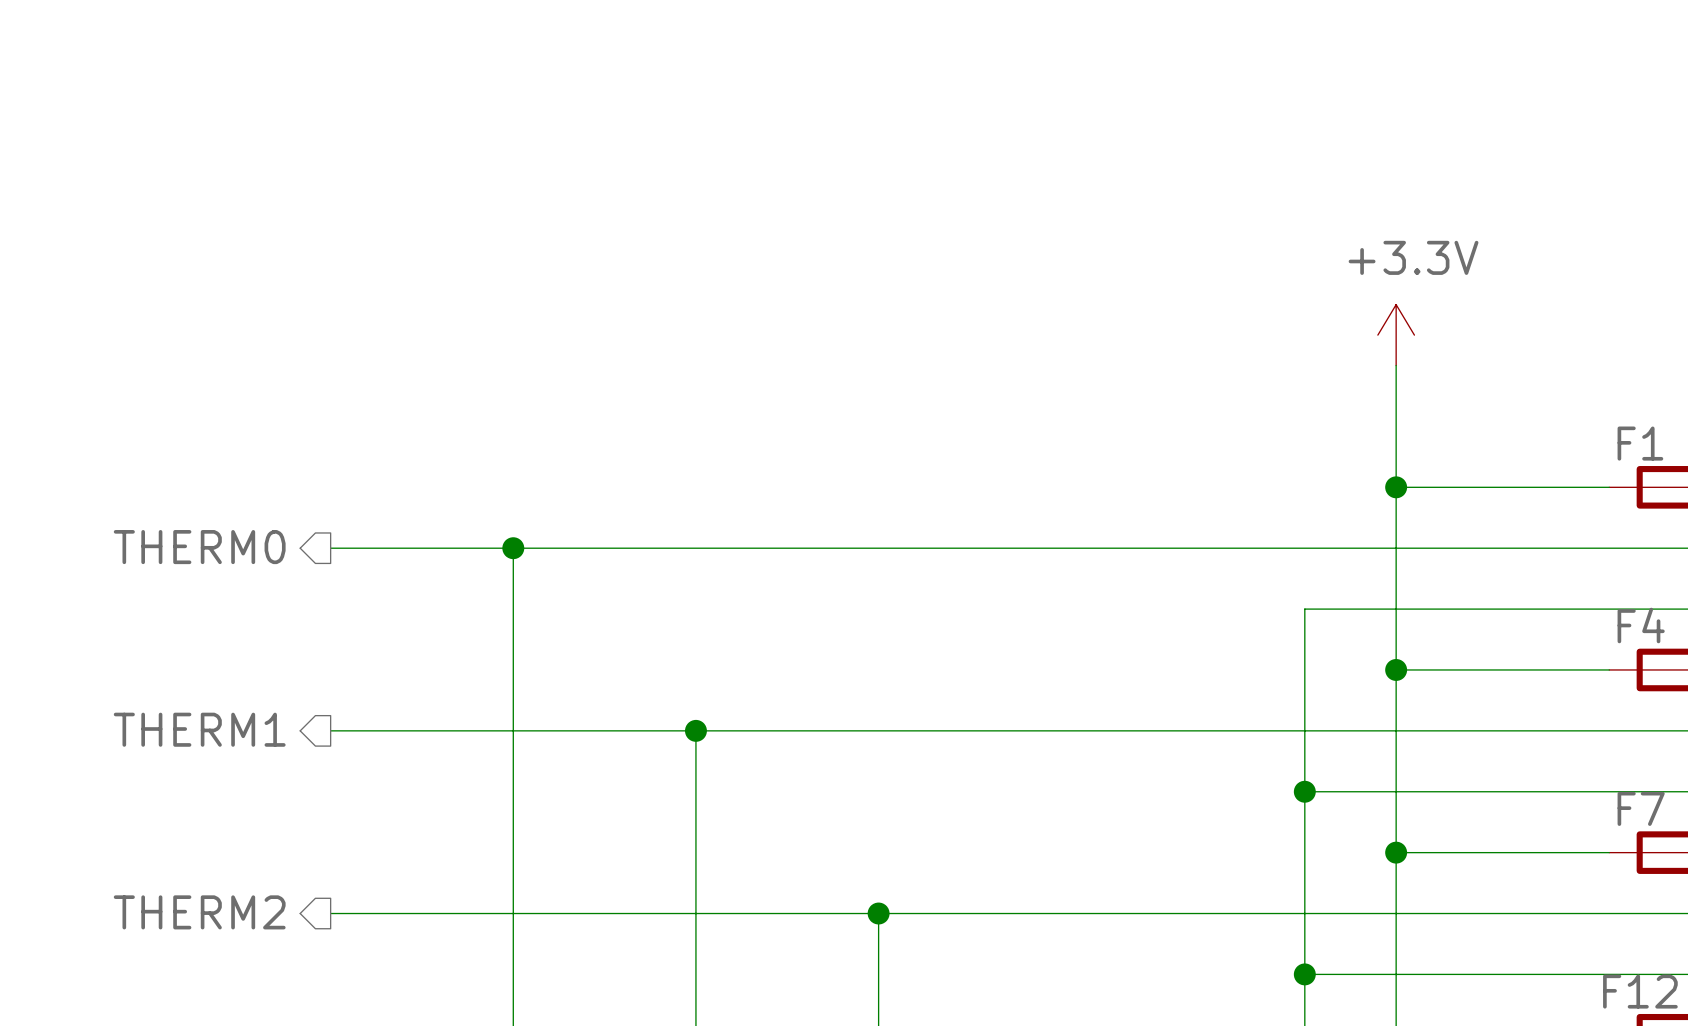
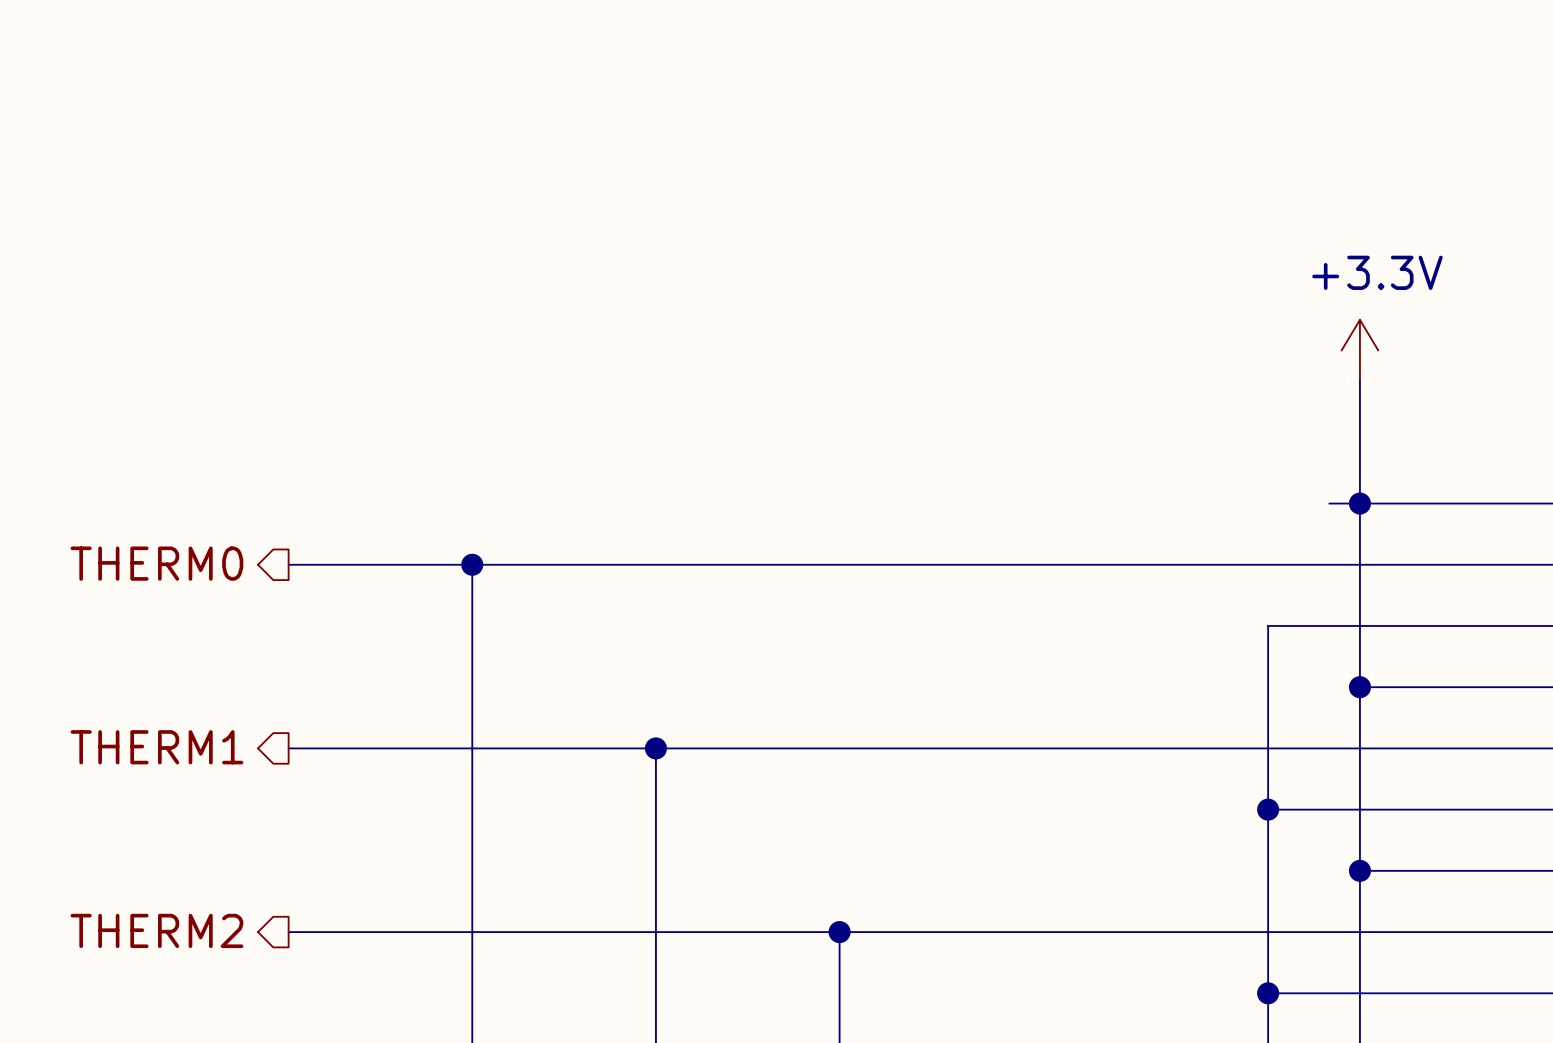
wire: none -> (1329, 503) (1359, 503)

